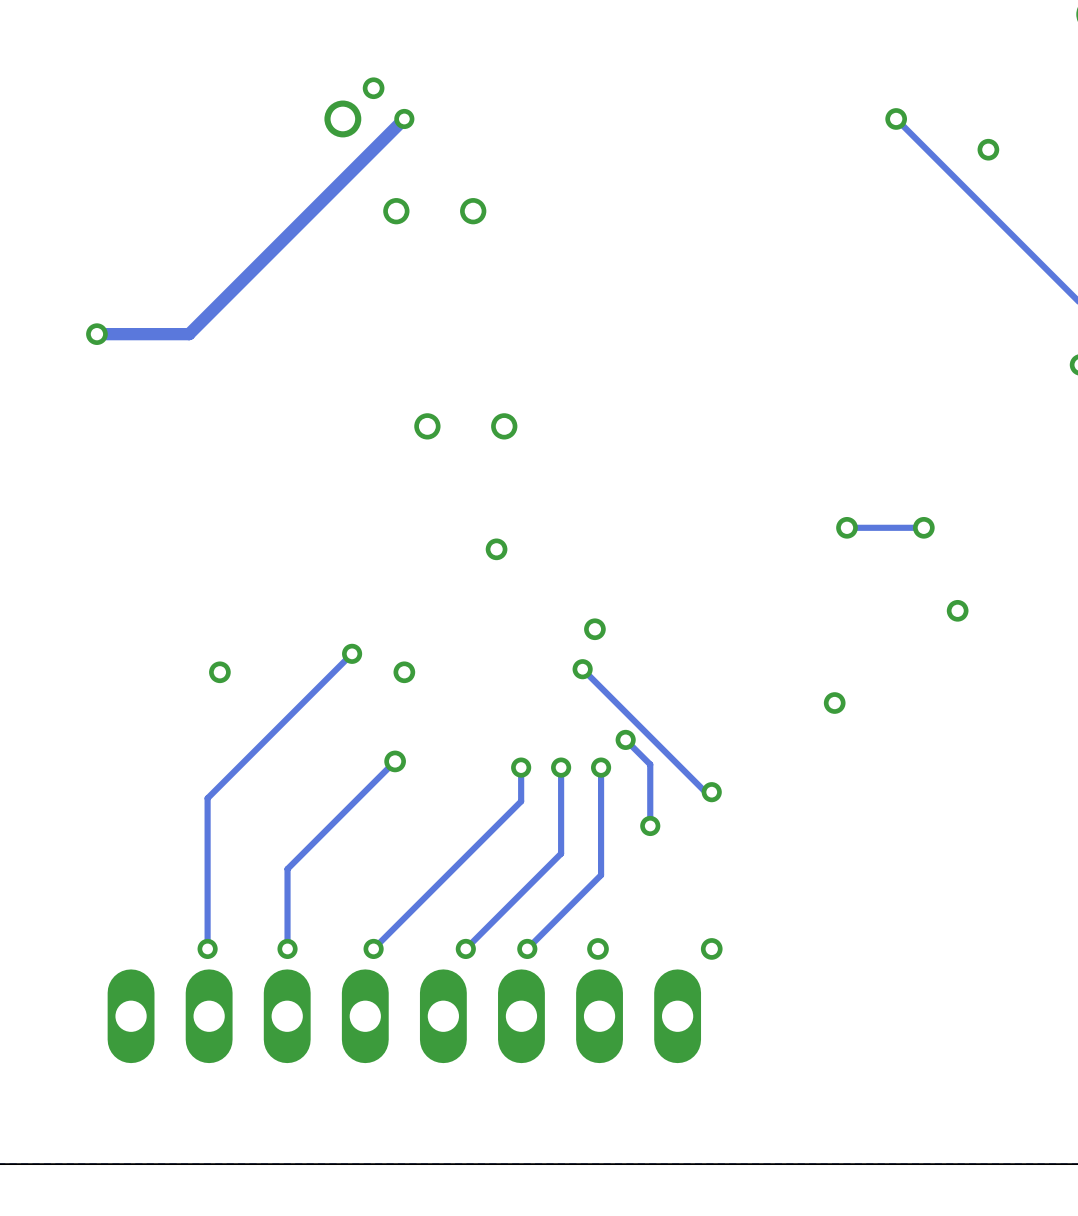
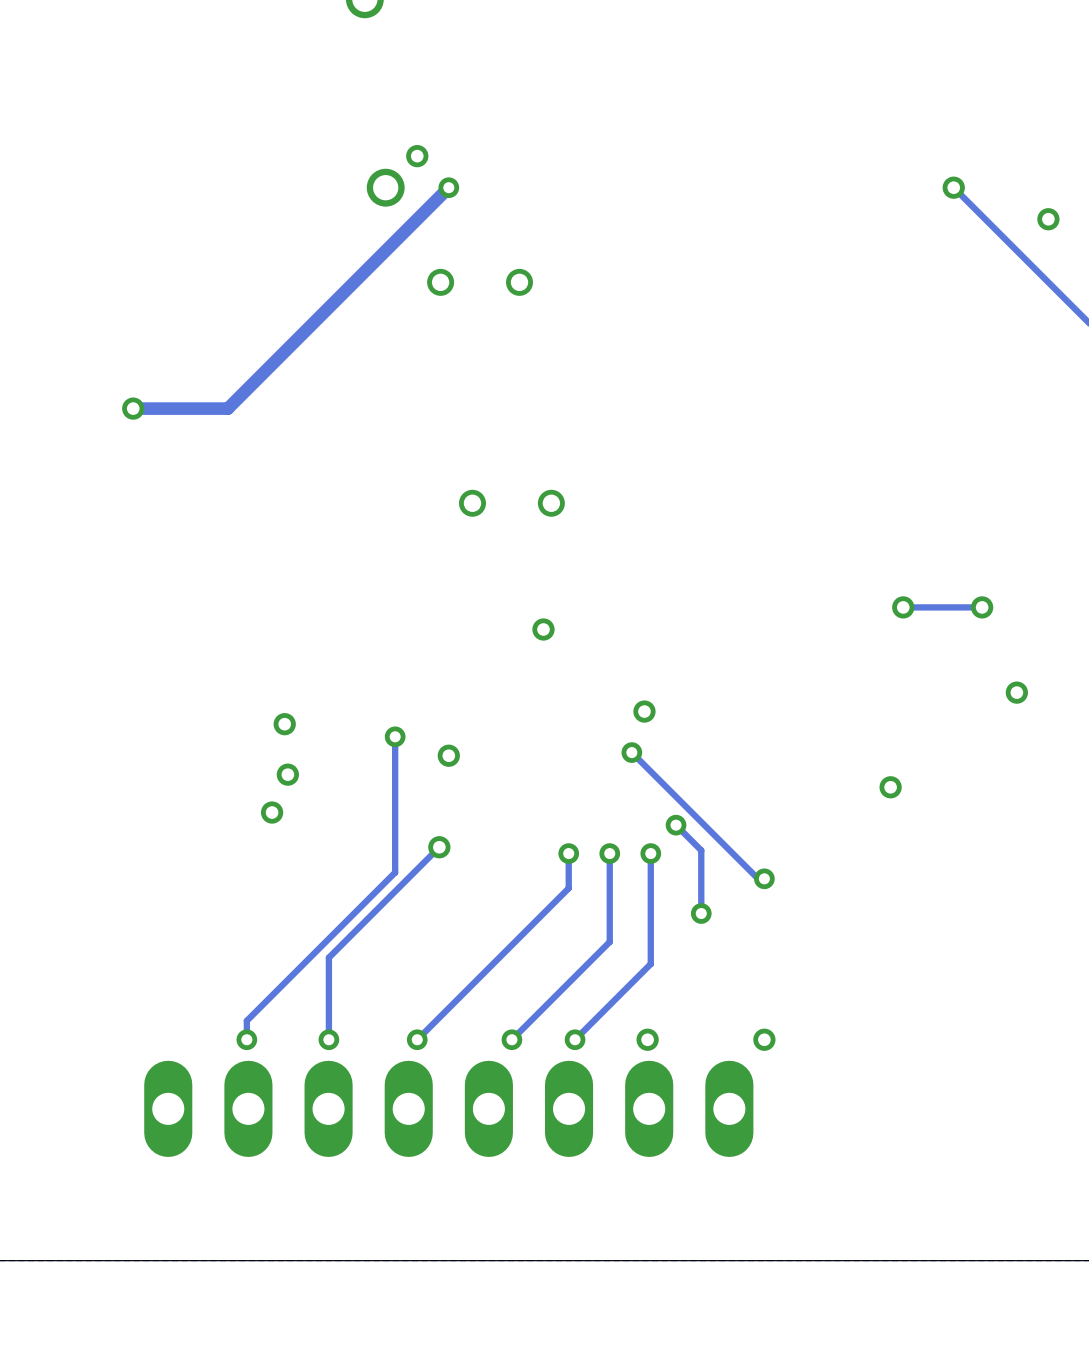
via: none -> (284, 724)
track: (352, 653) (207, 798) (207, 930) -> (395, 736) (395, 872) (246, 1020)
via: (219, 672) -> none
via: none -> (287, 774)
via: none -> (272, 812)

